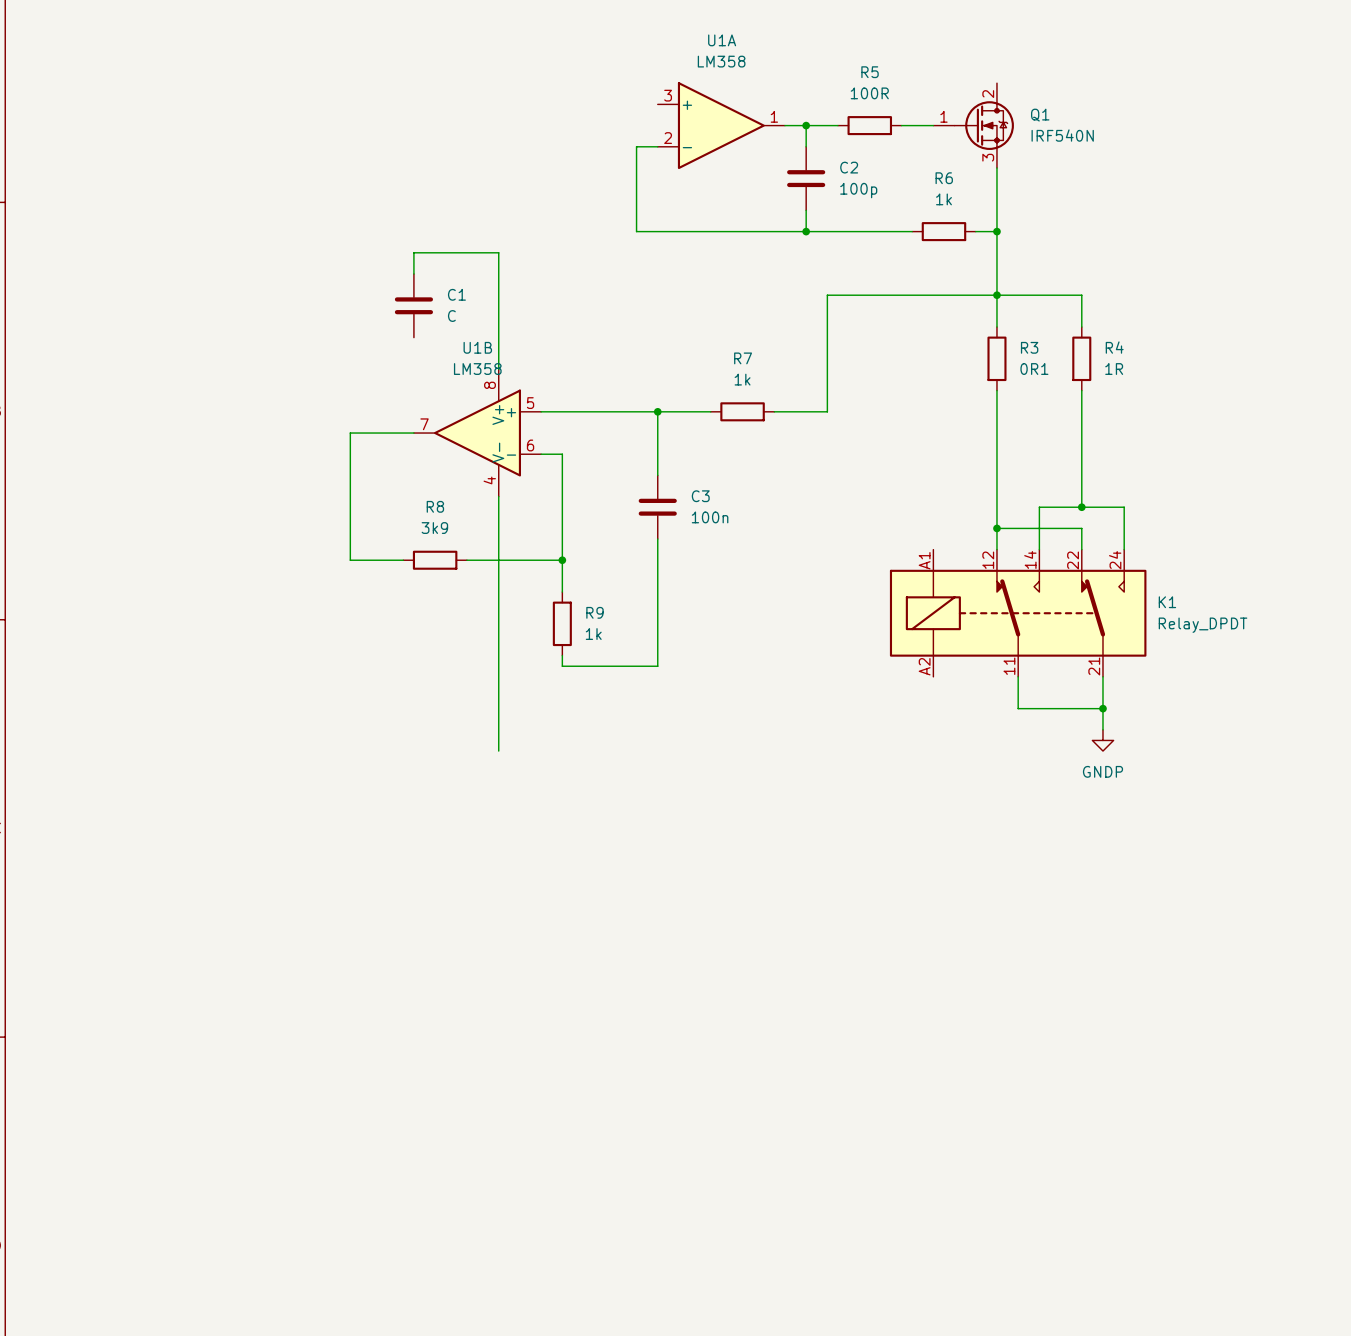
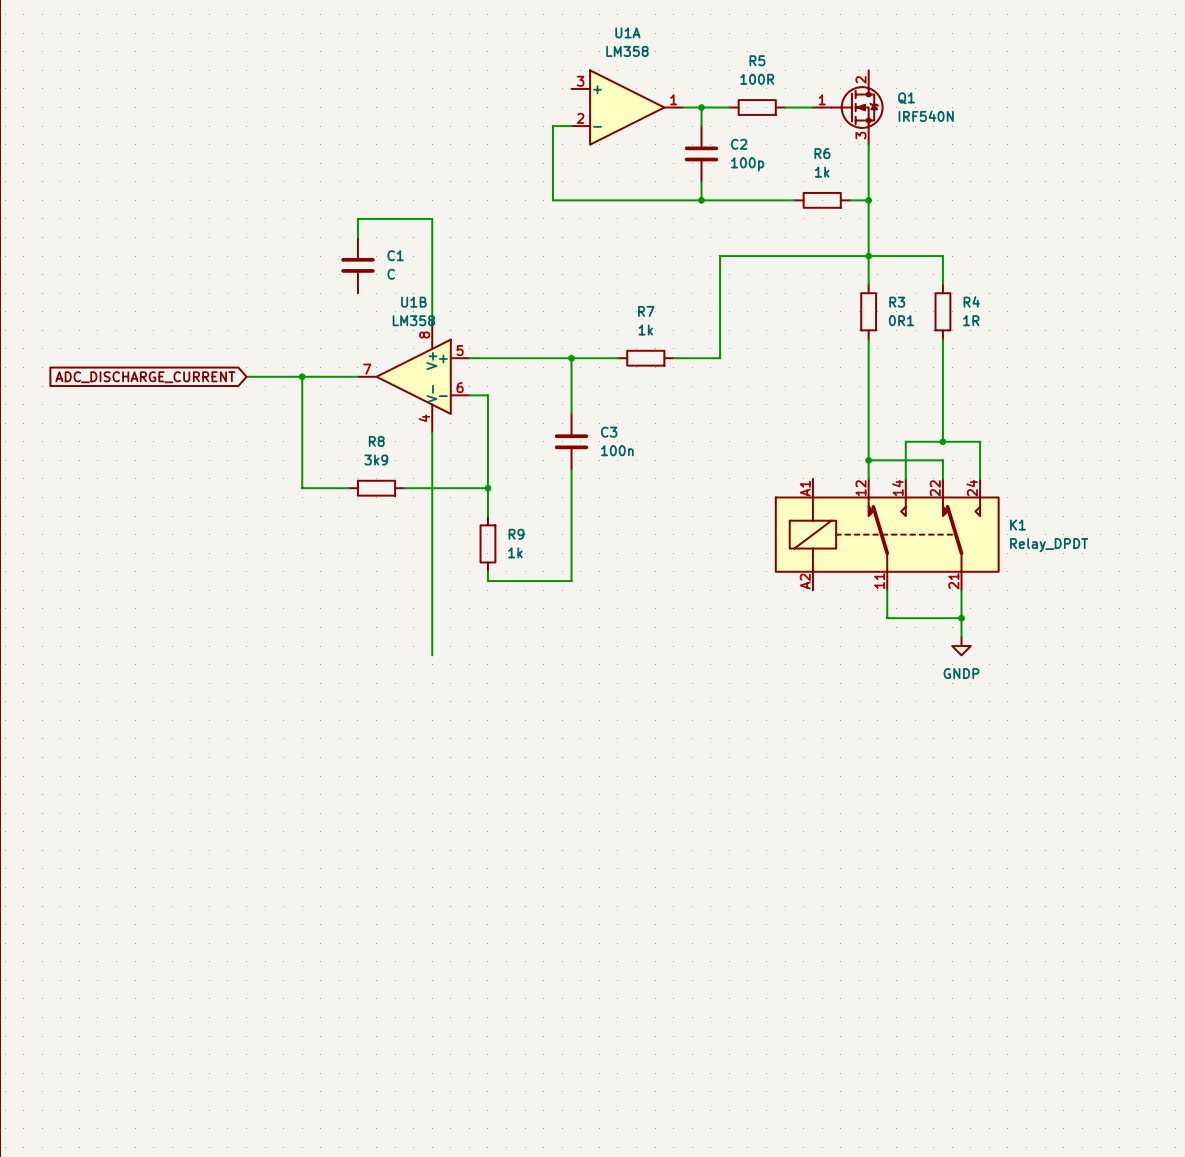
global label: none -> ADC_DISCHARGE_CURRENT (145, 377)
wire: none -> (246, 376) (302, 376)
junction: none -> (302, 376)

